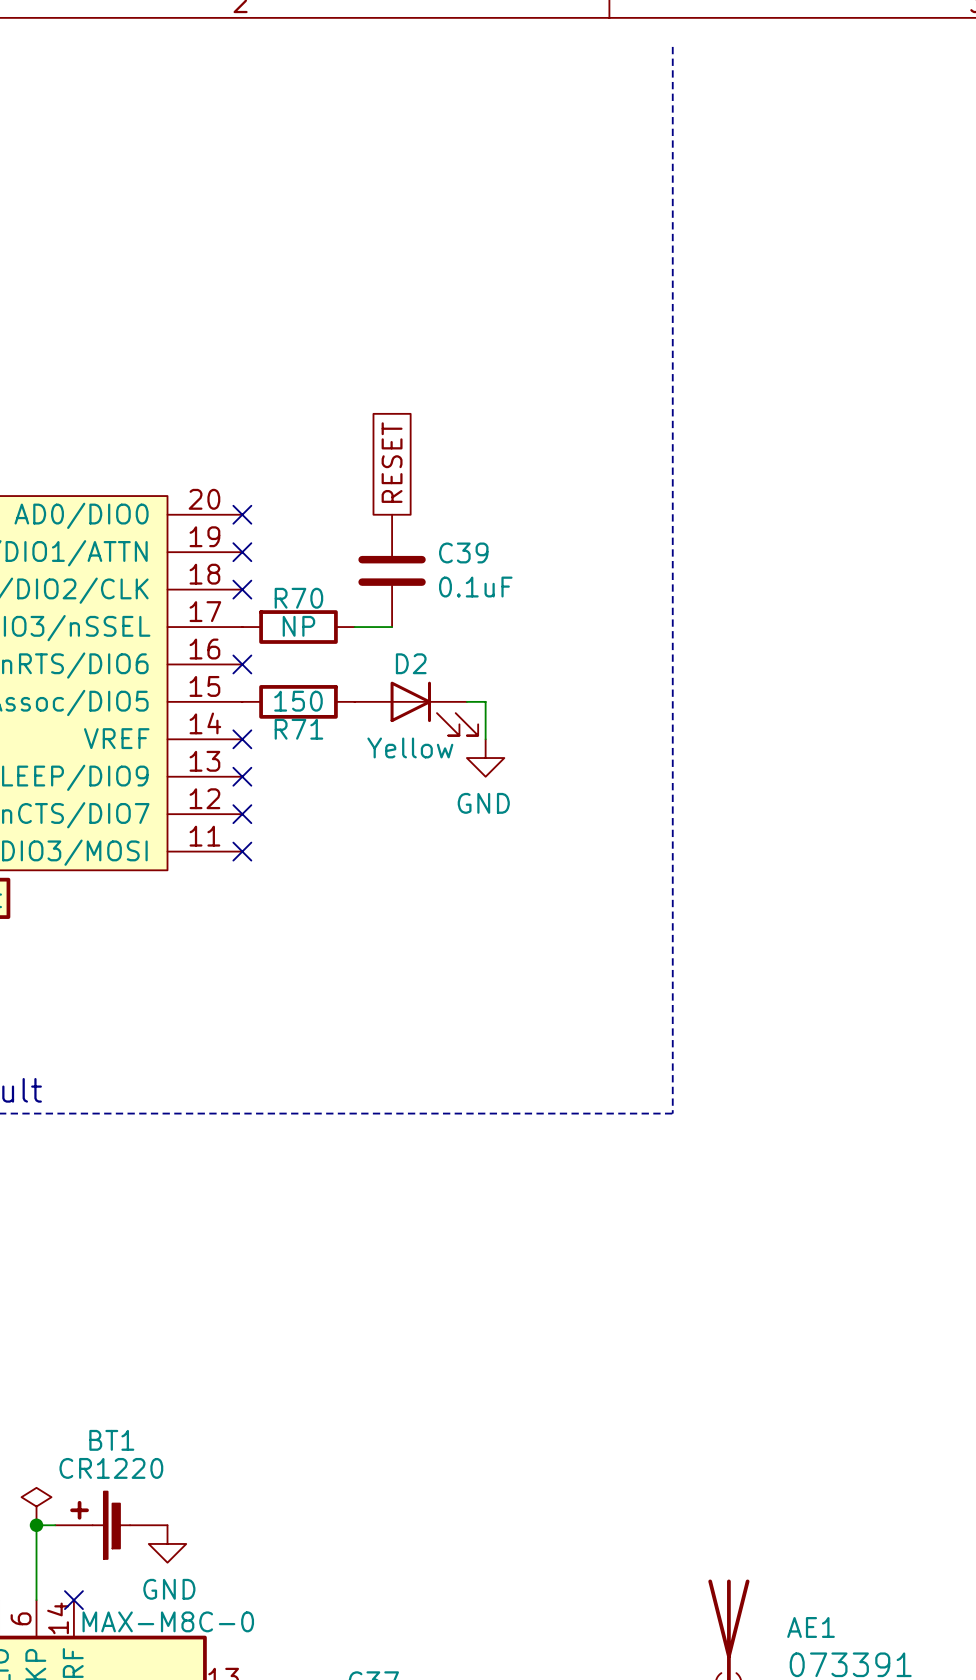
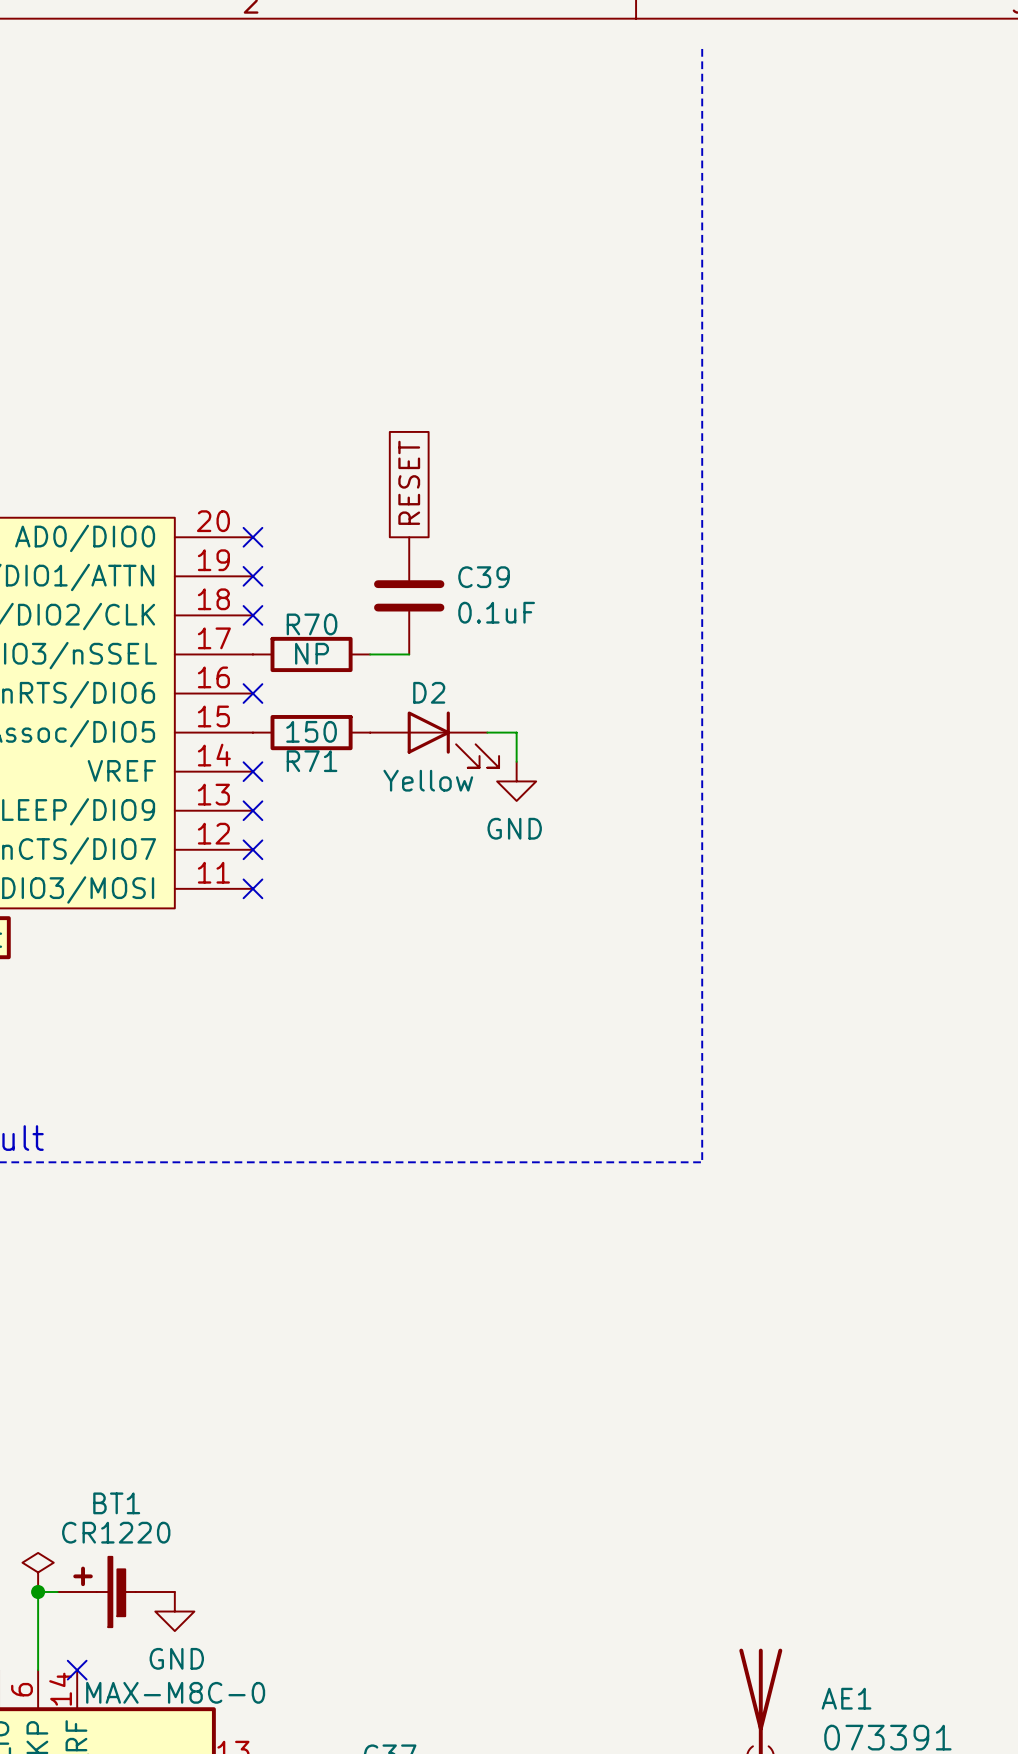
wire: (485, 701) (485, 739) -> (506, 732) (516, 732) (516, 761)
power symbol position: GND (485, 758) -> GND (516, 781)

